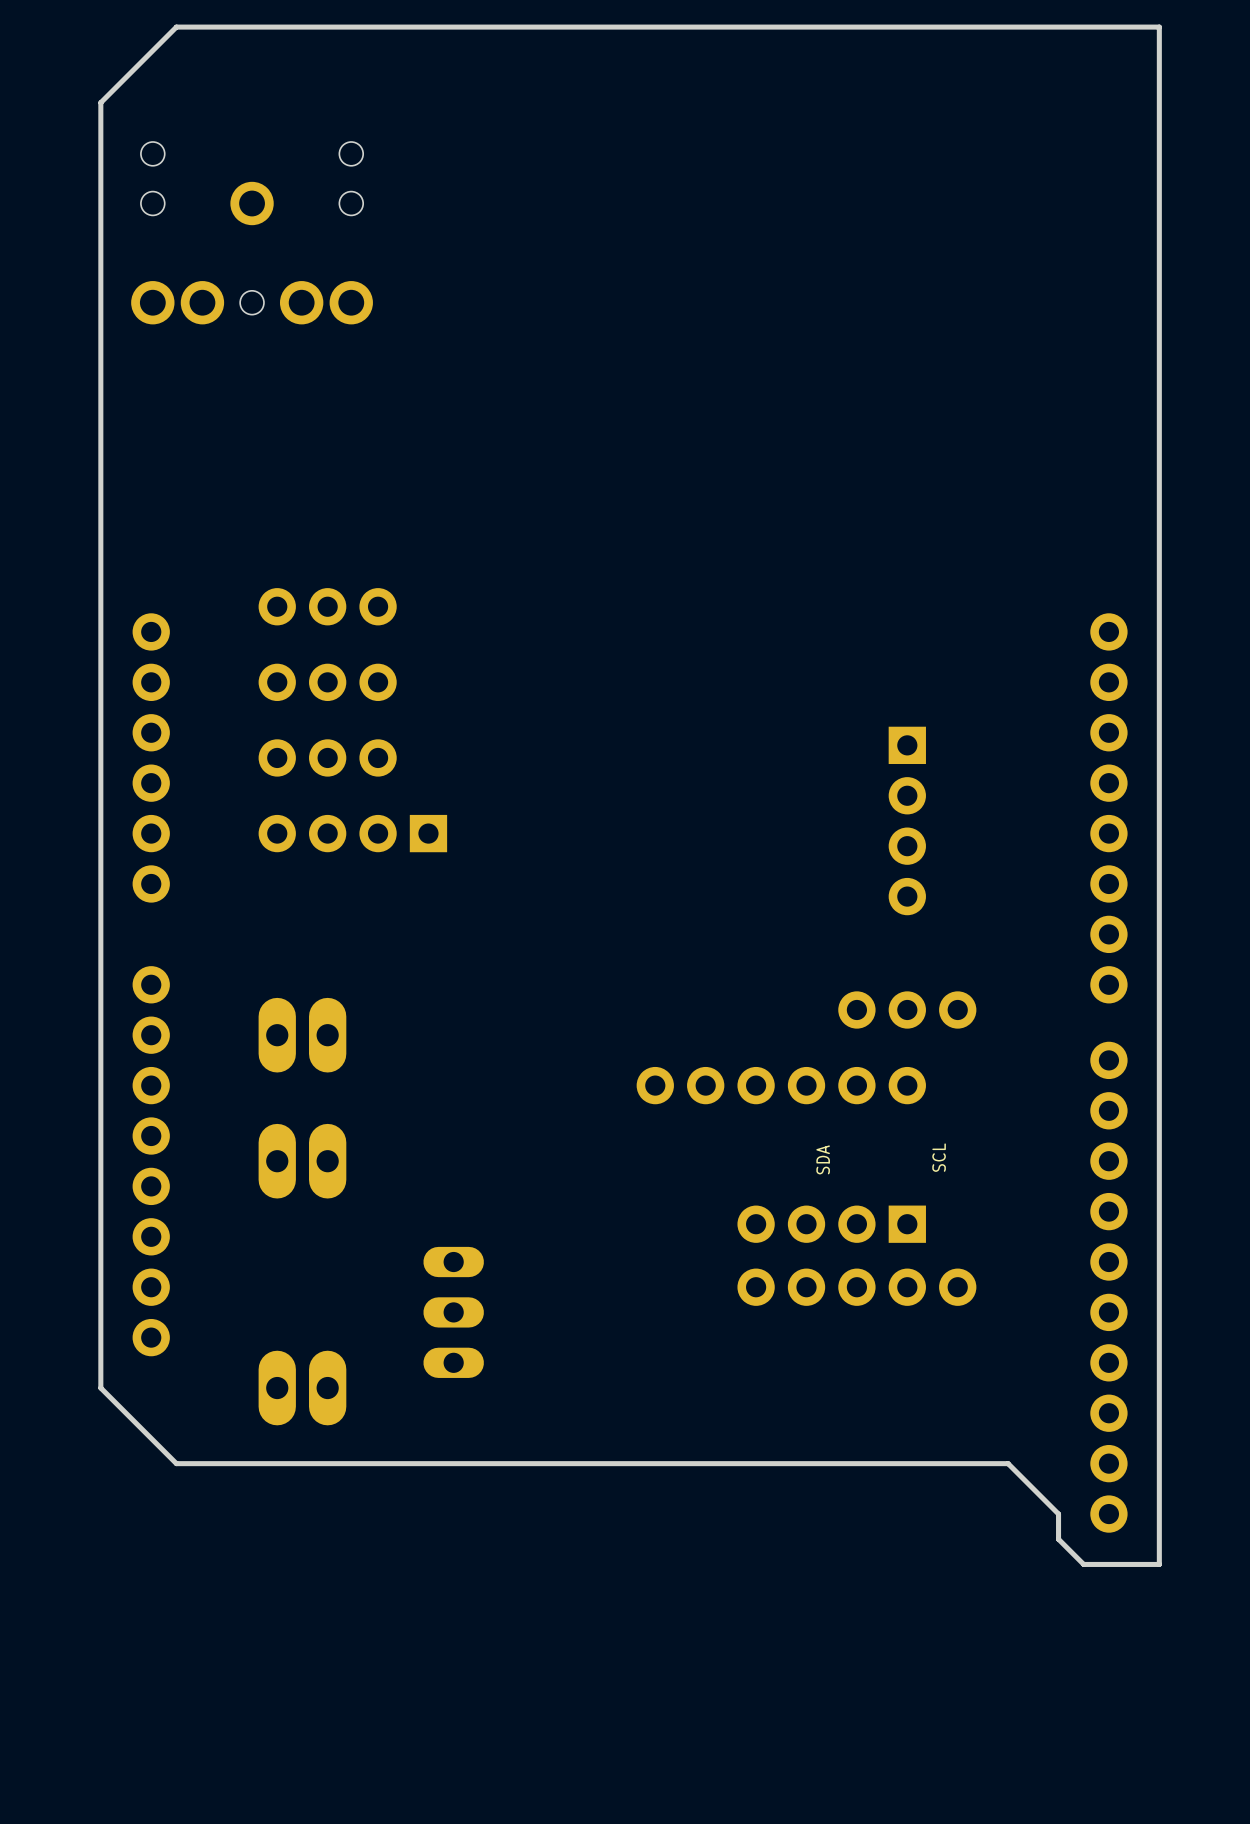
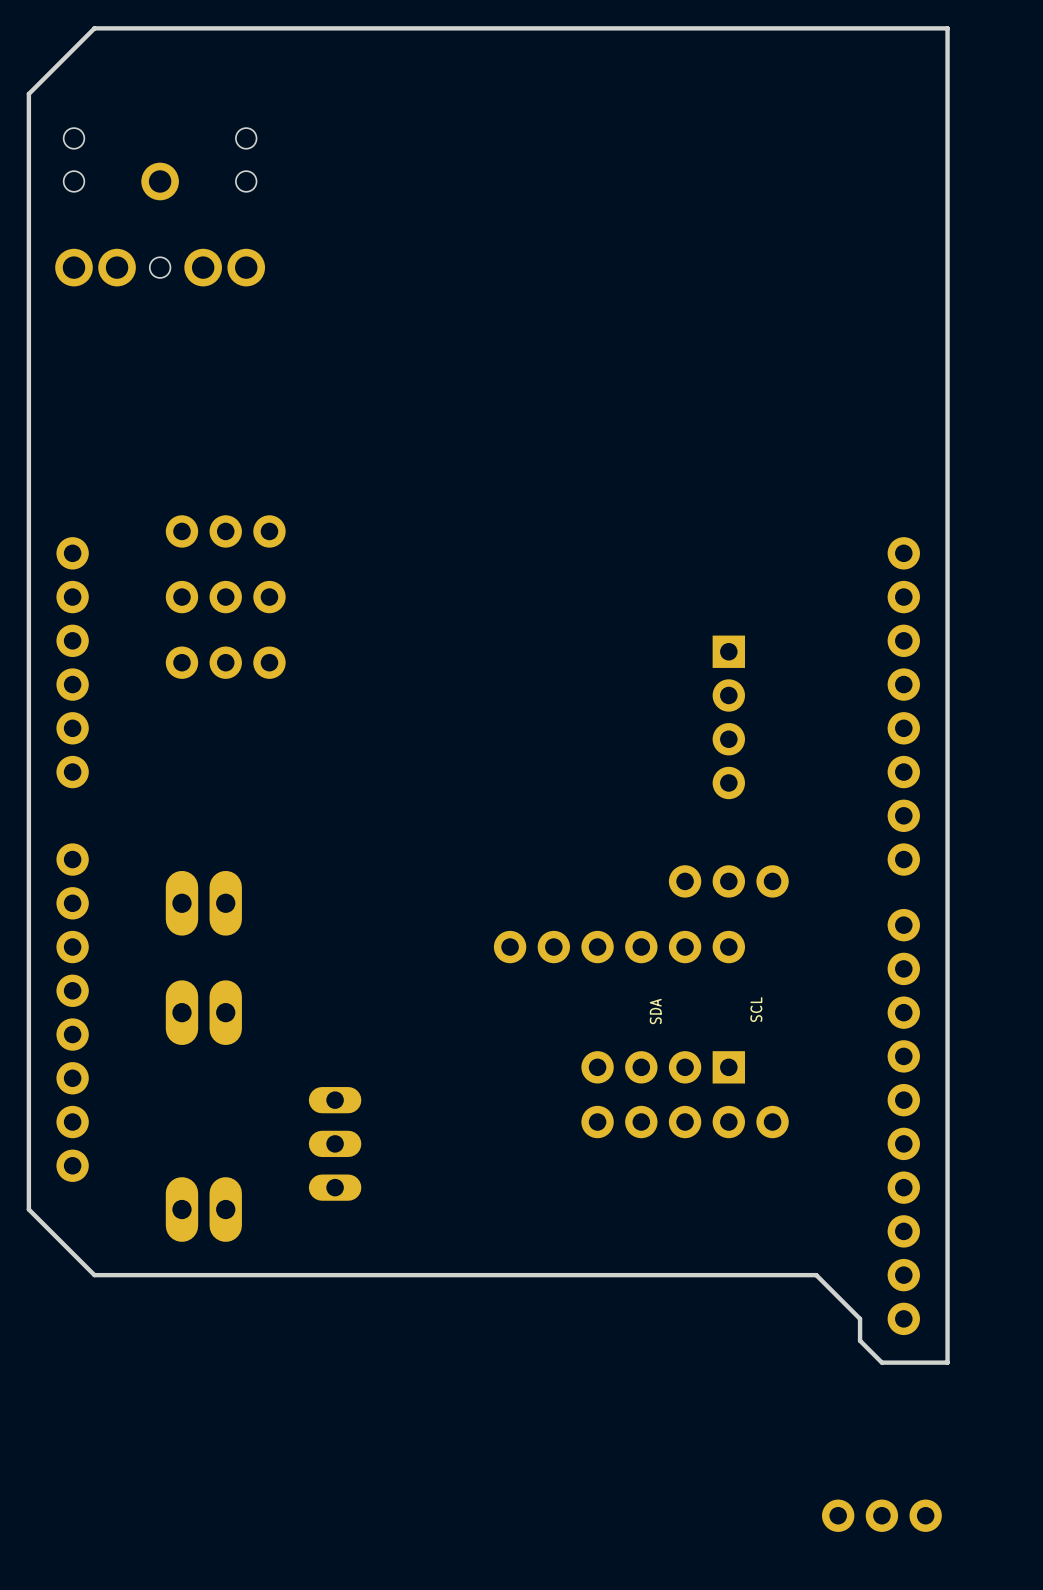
part: (352, 833) -> none
part: none -> (881, 1515)

